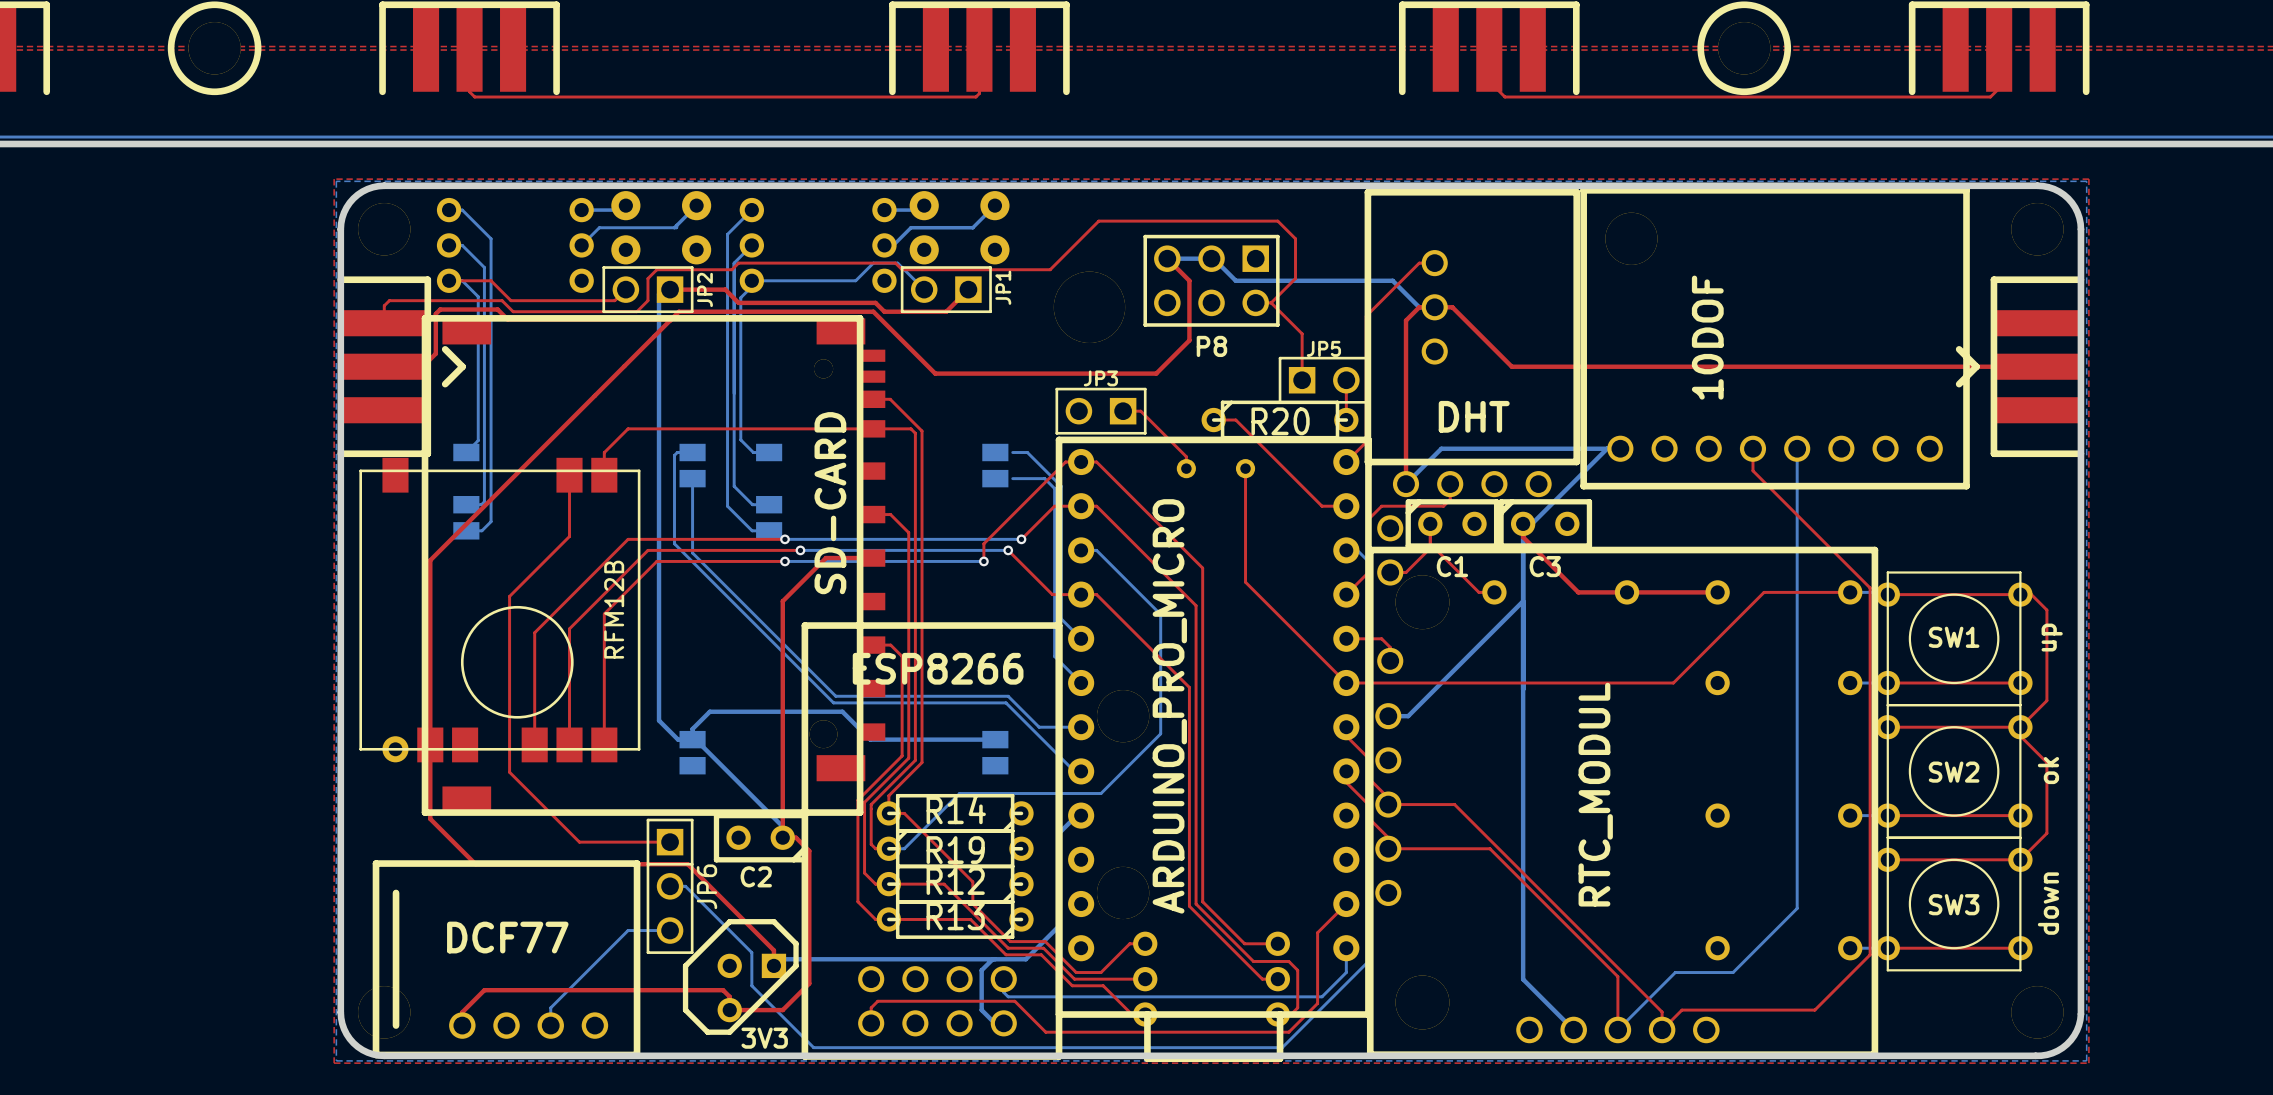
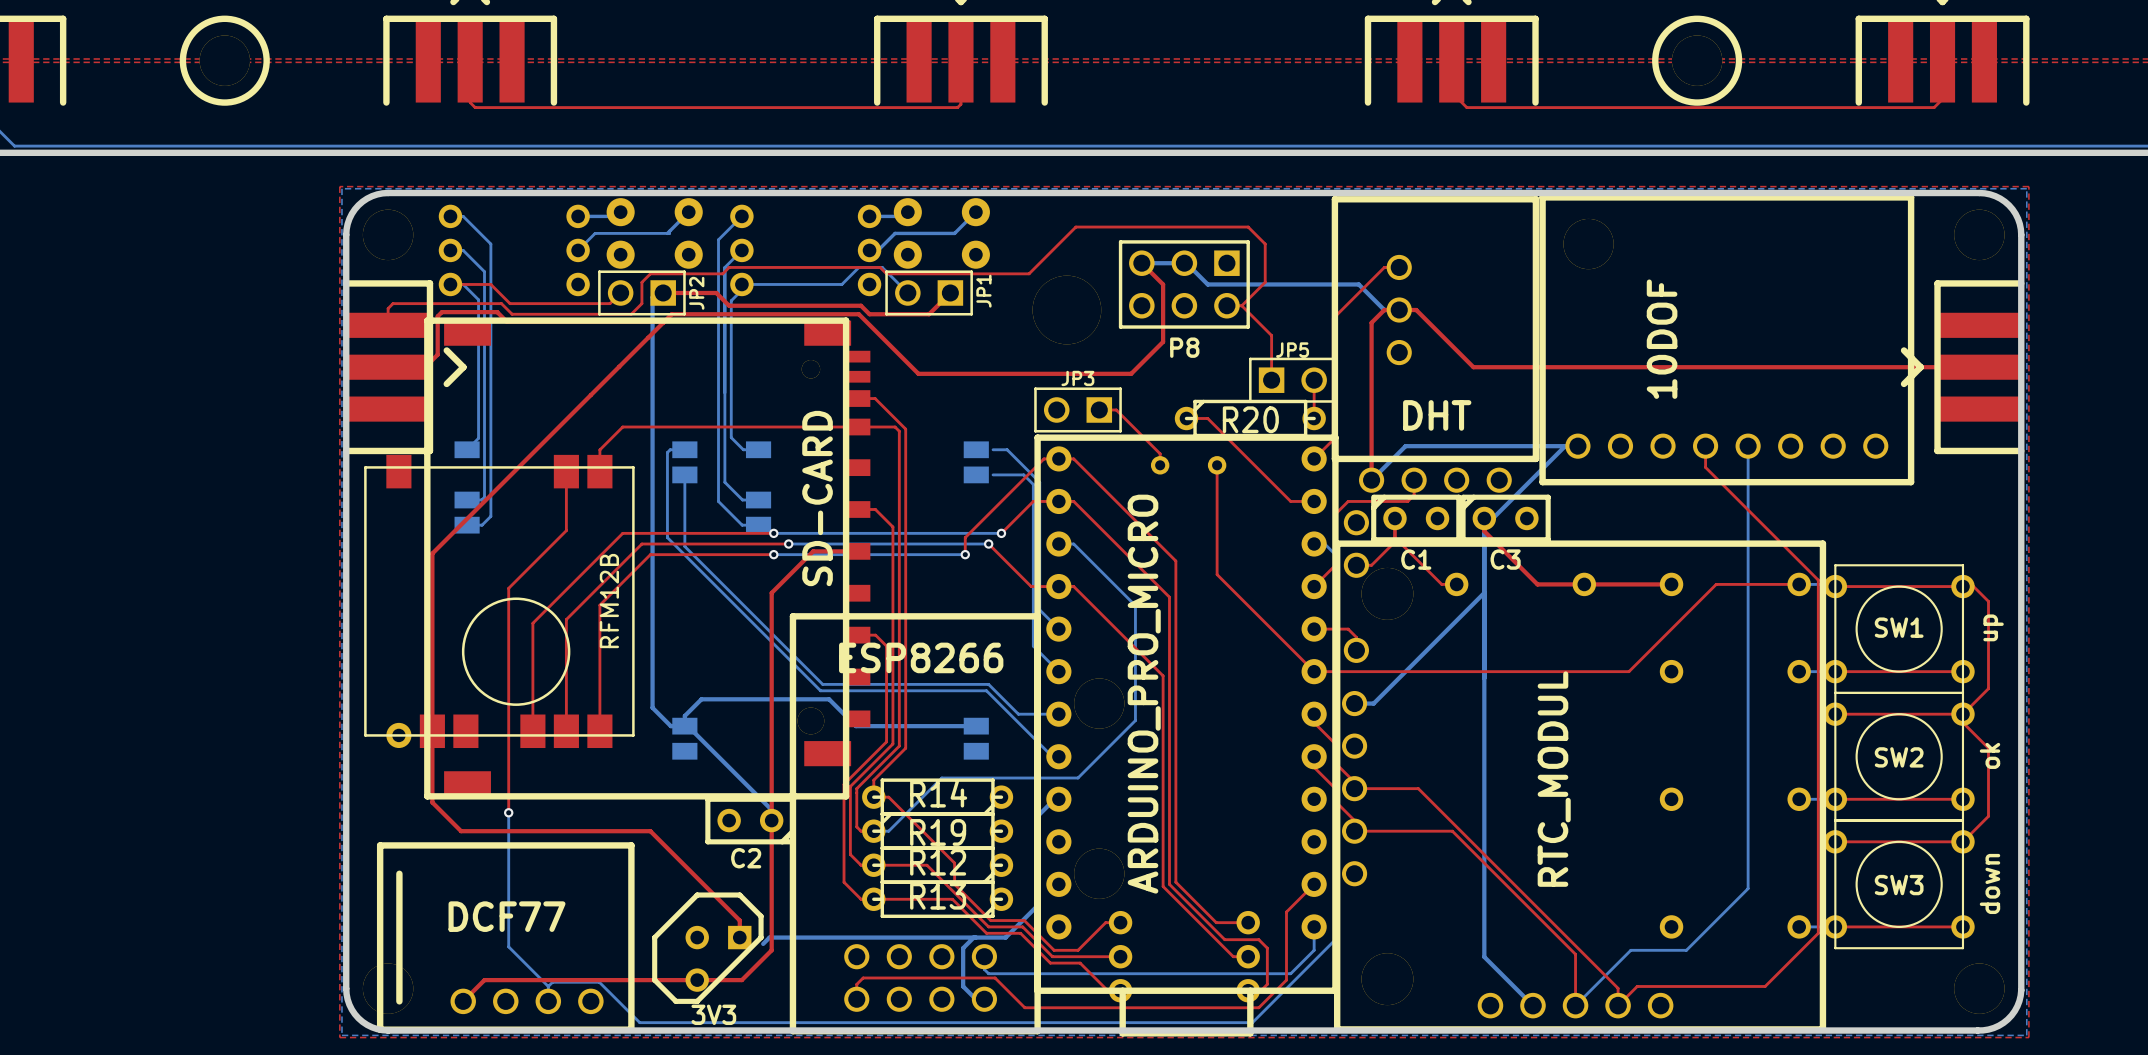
top track: (509, 772) (579, 842) (670, 842) -> (508, 757) (508, 812)
via: none -> (508, 812)
top track: (782, 837) (796, 837) (809, 850) (809, 983) (782, 1010) (729, 1010) (729, 996) (723, 990) (484, 990) (462, 1012) (462, 1025) -> (771, 820) (771, 950) (741, 980) (484, 980) (463, 1001)
top track: (460, 848) (475, 864) (687, 864) (773, 950) (773, 965) -> (461, 831) (650, 831) (739, 920) (739, 937)
bottom track: (670, 886) (685, 886) (751, 952) (751, 985) (813, 1047) -> (508, 812) (508, 946) (548, 986) (552, 982) (599, 982) (639, 1022) (801, 1022)
JP6: (670, 886) -> none
bottom track: (670, 930) (628, 930) (550, 1007) (550, 1010) -> none
part position: (740, 976) -> (707, 948)
part value position: 3V3 (764, 1038) -> 3V3 (713, 1014)

